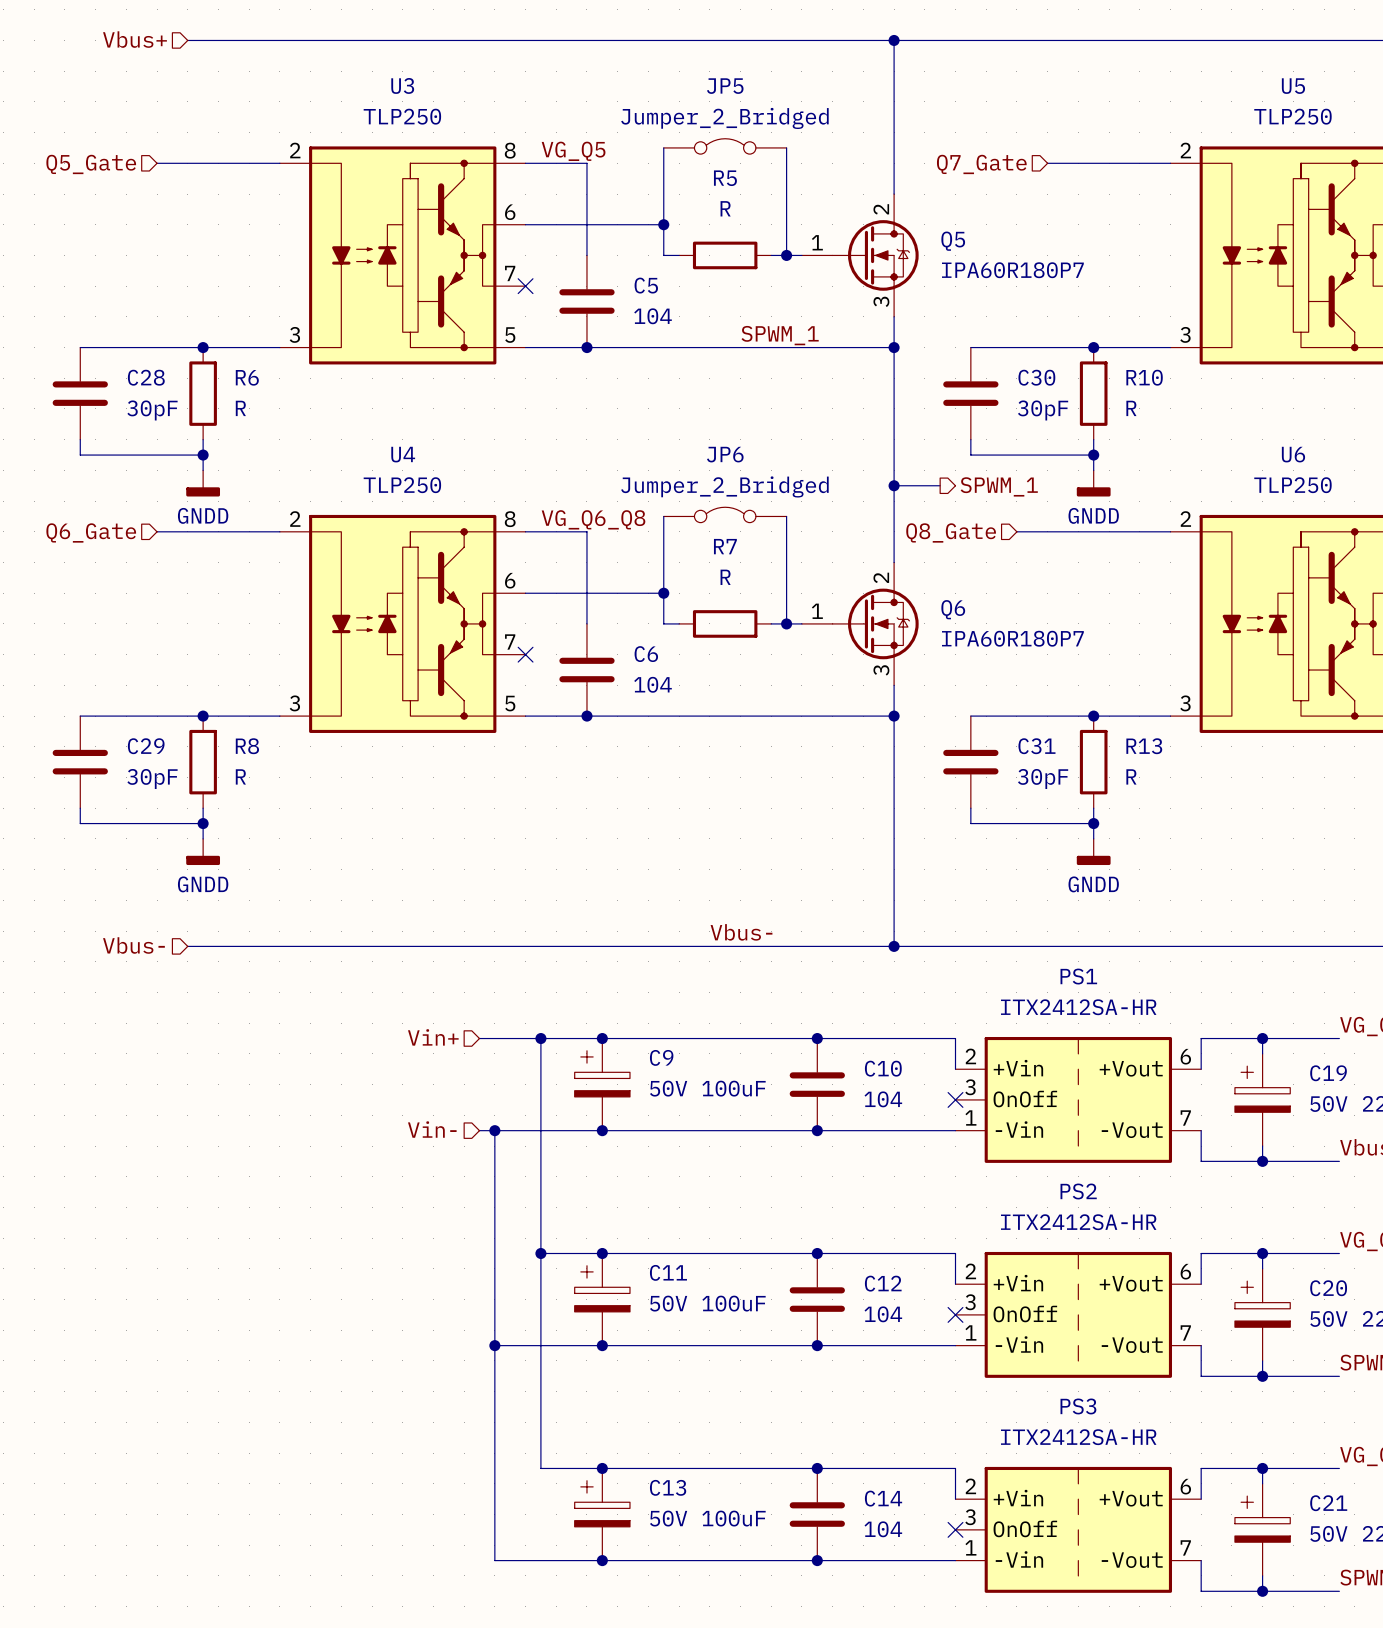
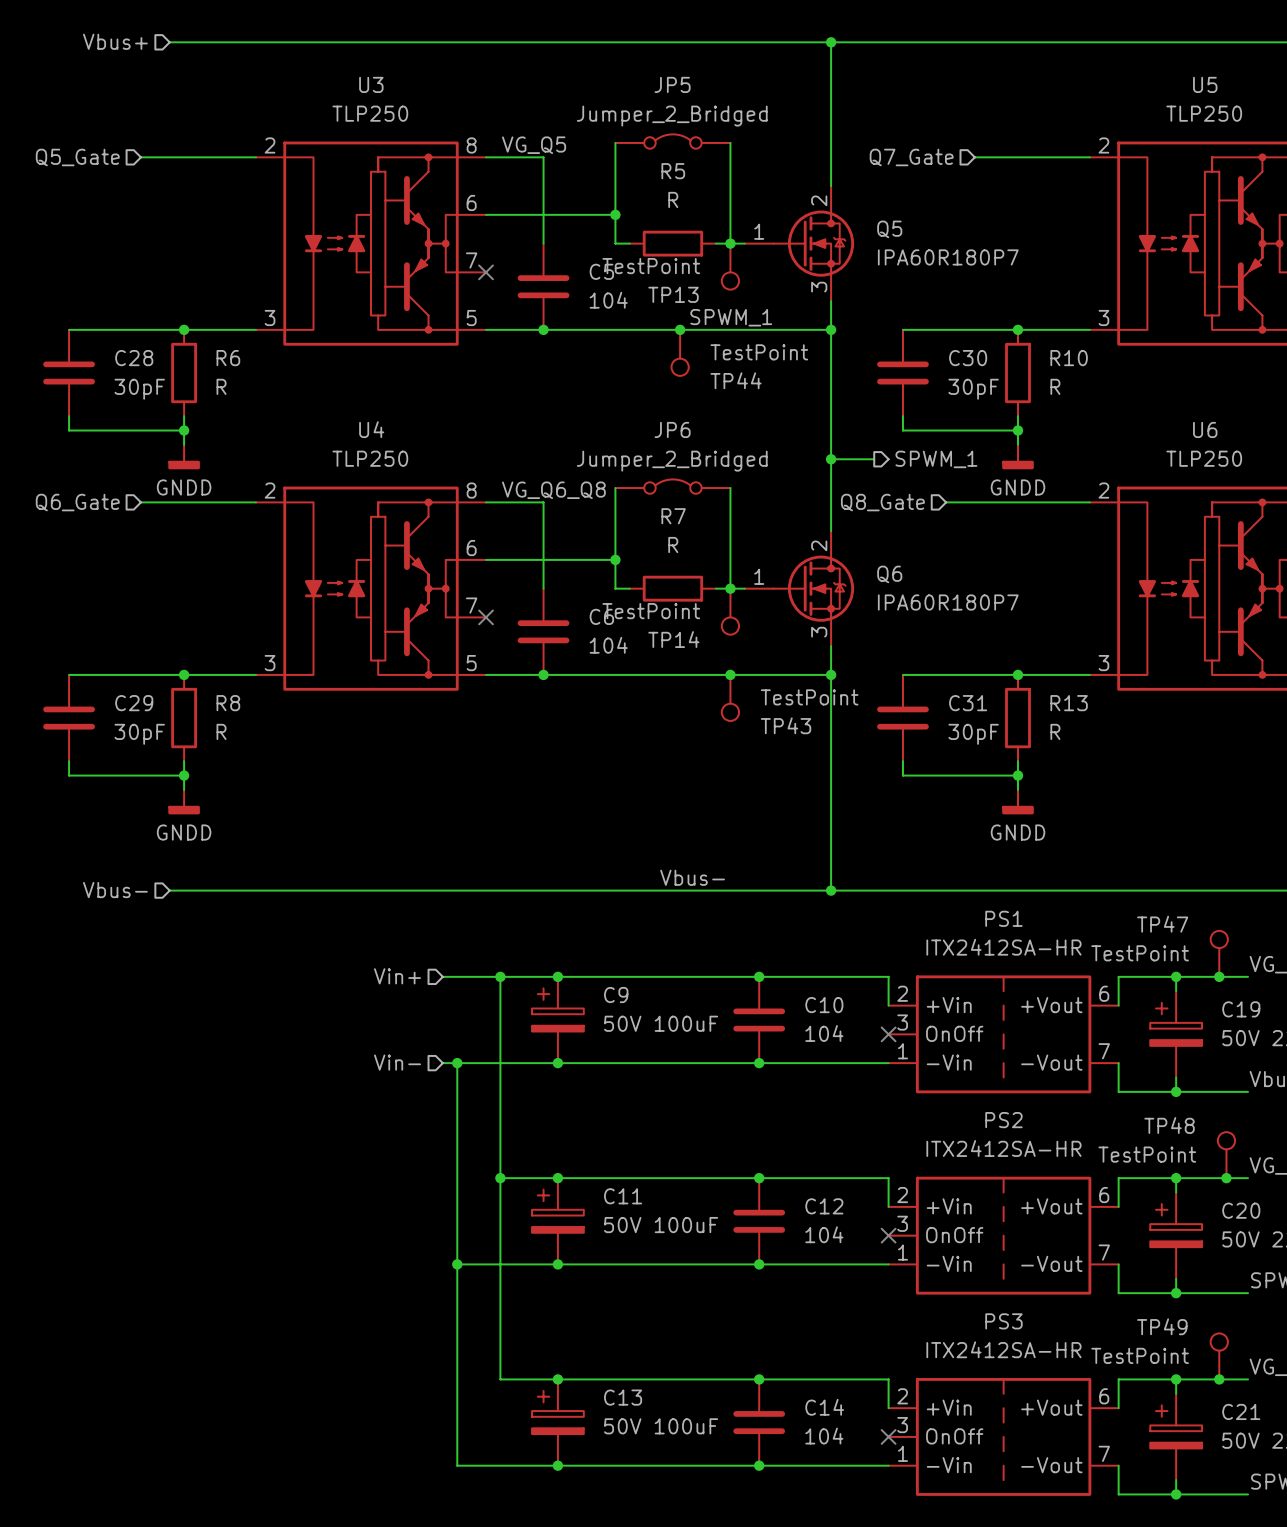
TP13: none -> TestPoint (730, 266)
junction: none -> (680, 329)
TP44: none -> TestPoint (680, 352)
TP14: none -> TestPoint (730, 611)
junction: none -> (730, 674)
TP43: none -> TestPoint (730, 697)
TP47: none -> TestPoint (1219, 953)
junction: none -> (1219, 976)
TP48: none -> TestPoint (1226, 1155)
junction: none -> (1226, 1178)
TP49: none -> TestPoint (1219, 1356)
junction: none -> (1219, 1379)

